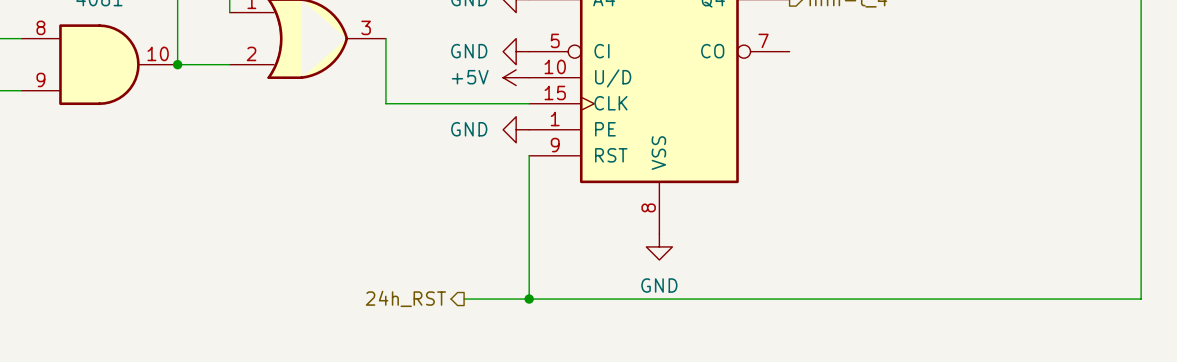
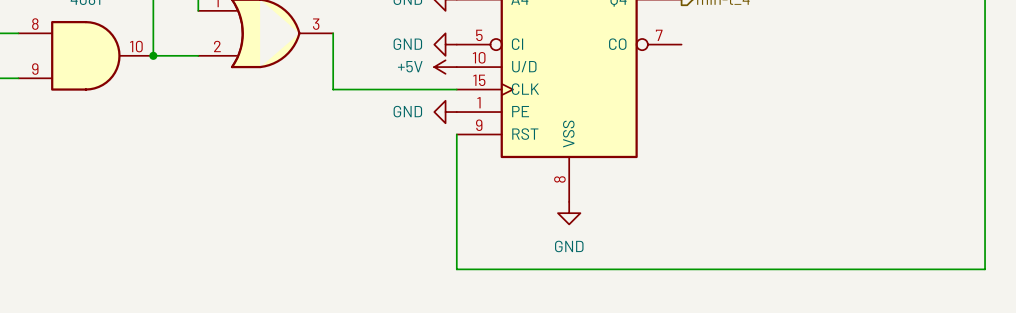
hierarchical label: 24h_RST (405, 298) -> none
wire: (464, 299) (1141, 299) -> (456, 258) (456, 269) (985, 269) (985, 258)
junction: (529, 299) -> none

